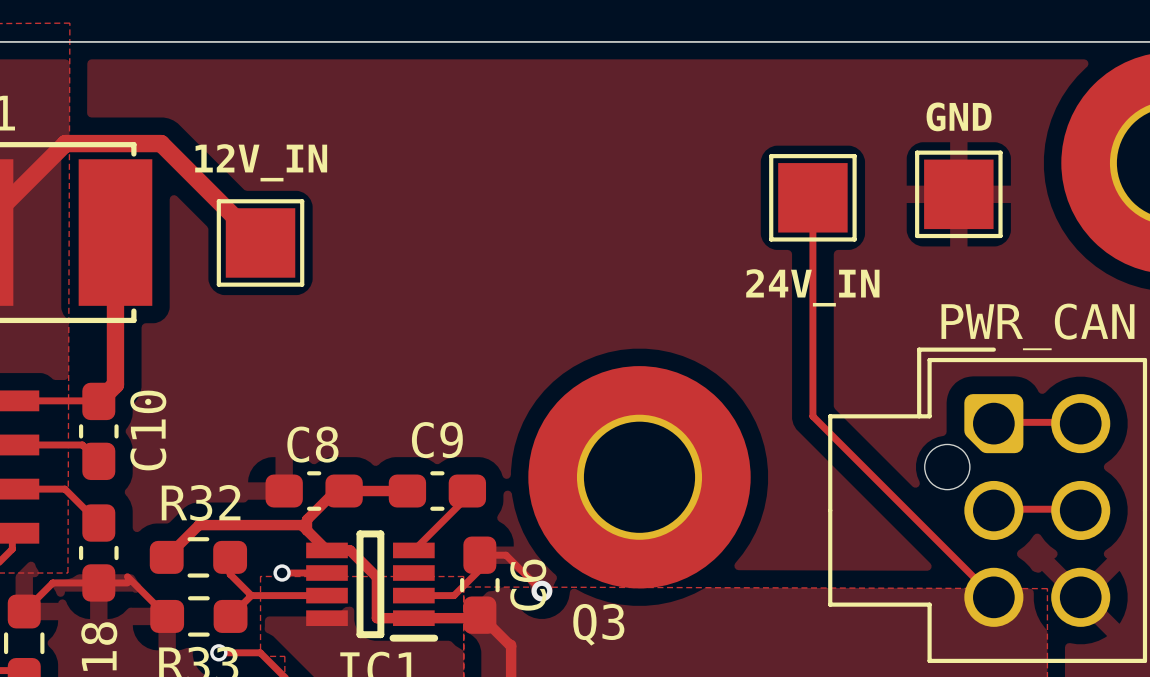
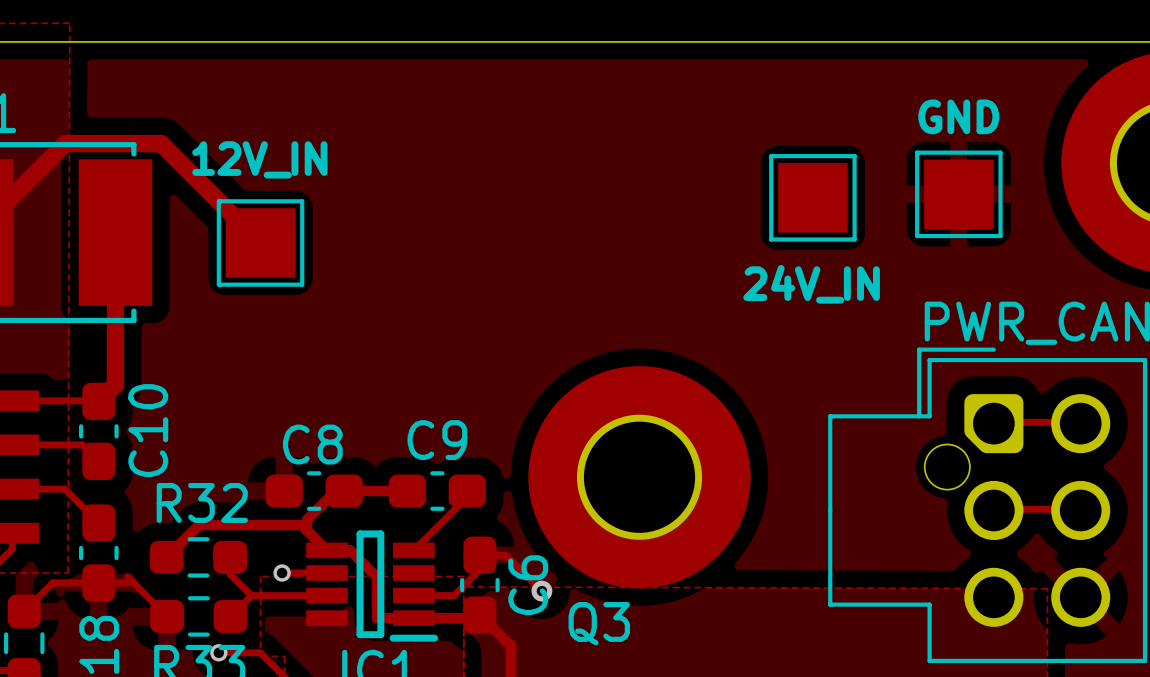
track: (812, 197) (812, 416) (993, 597) -> none

